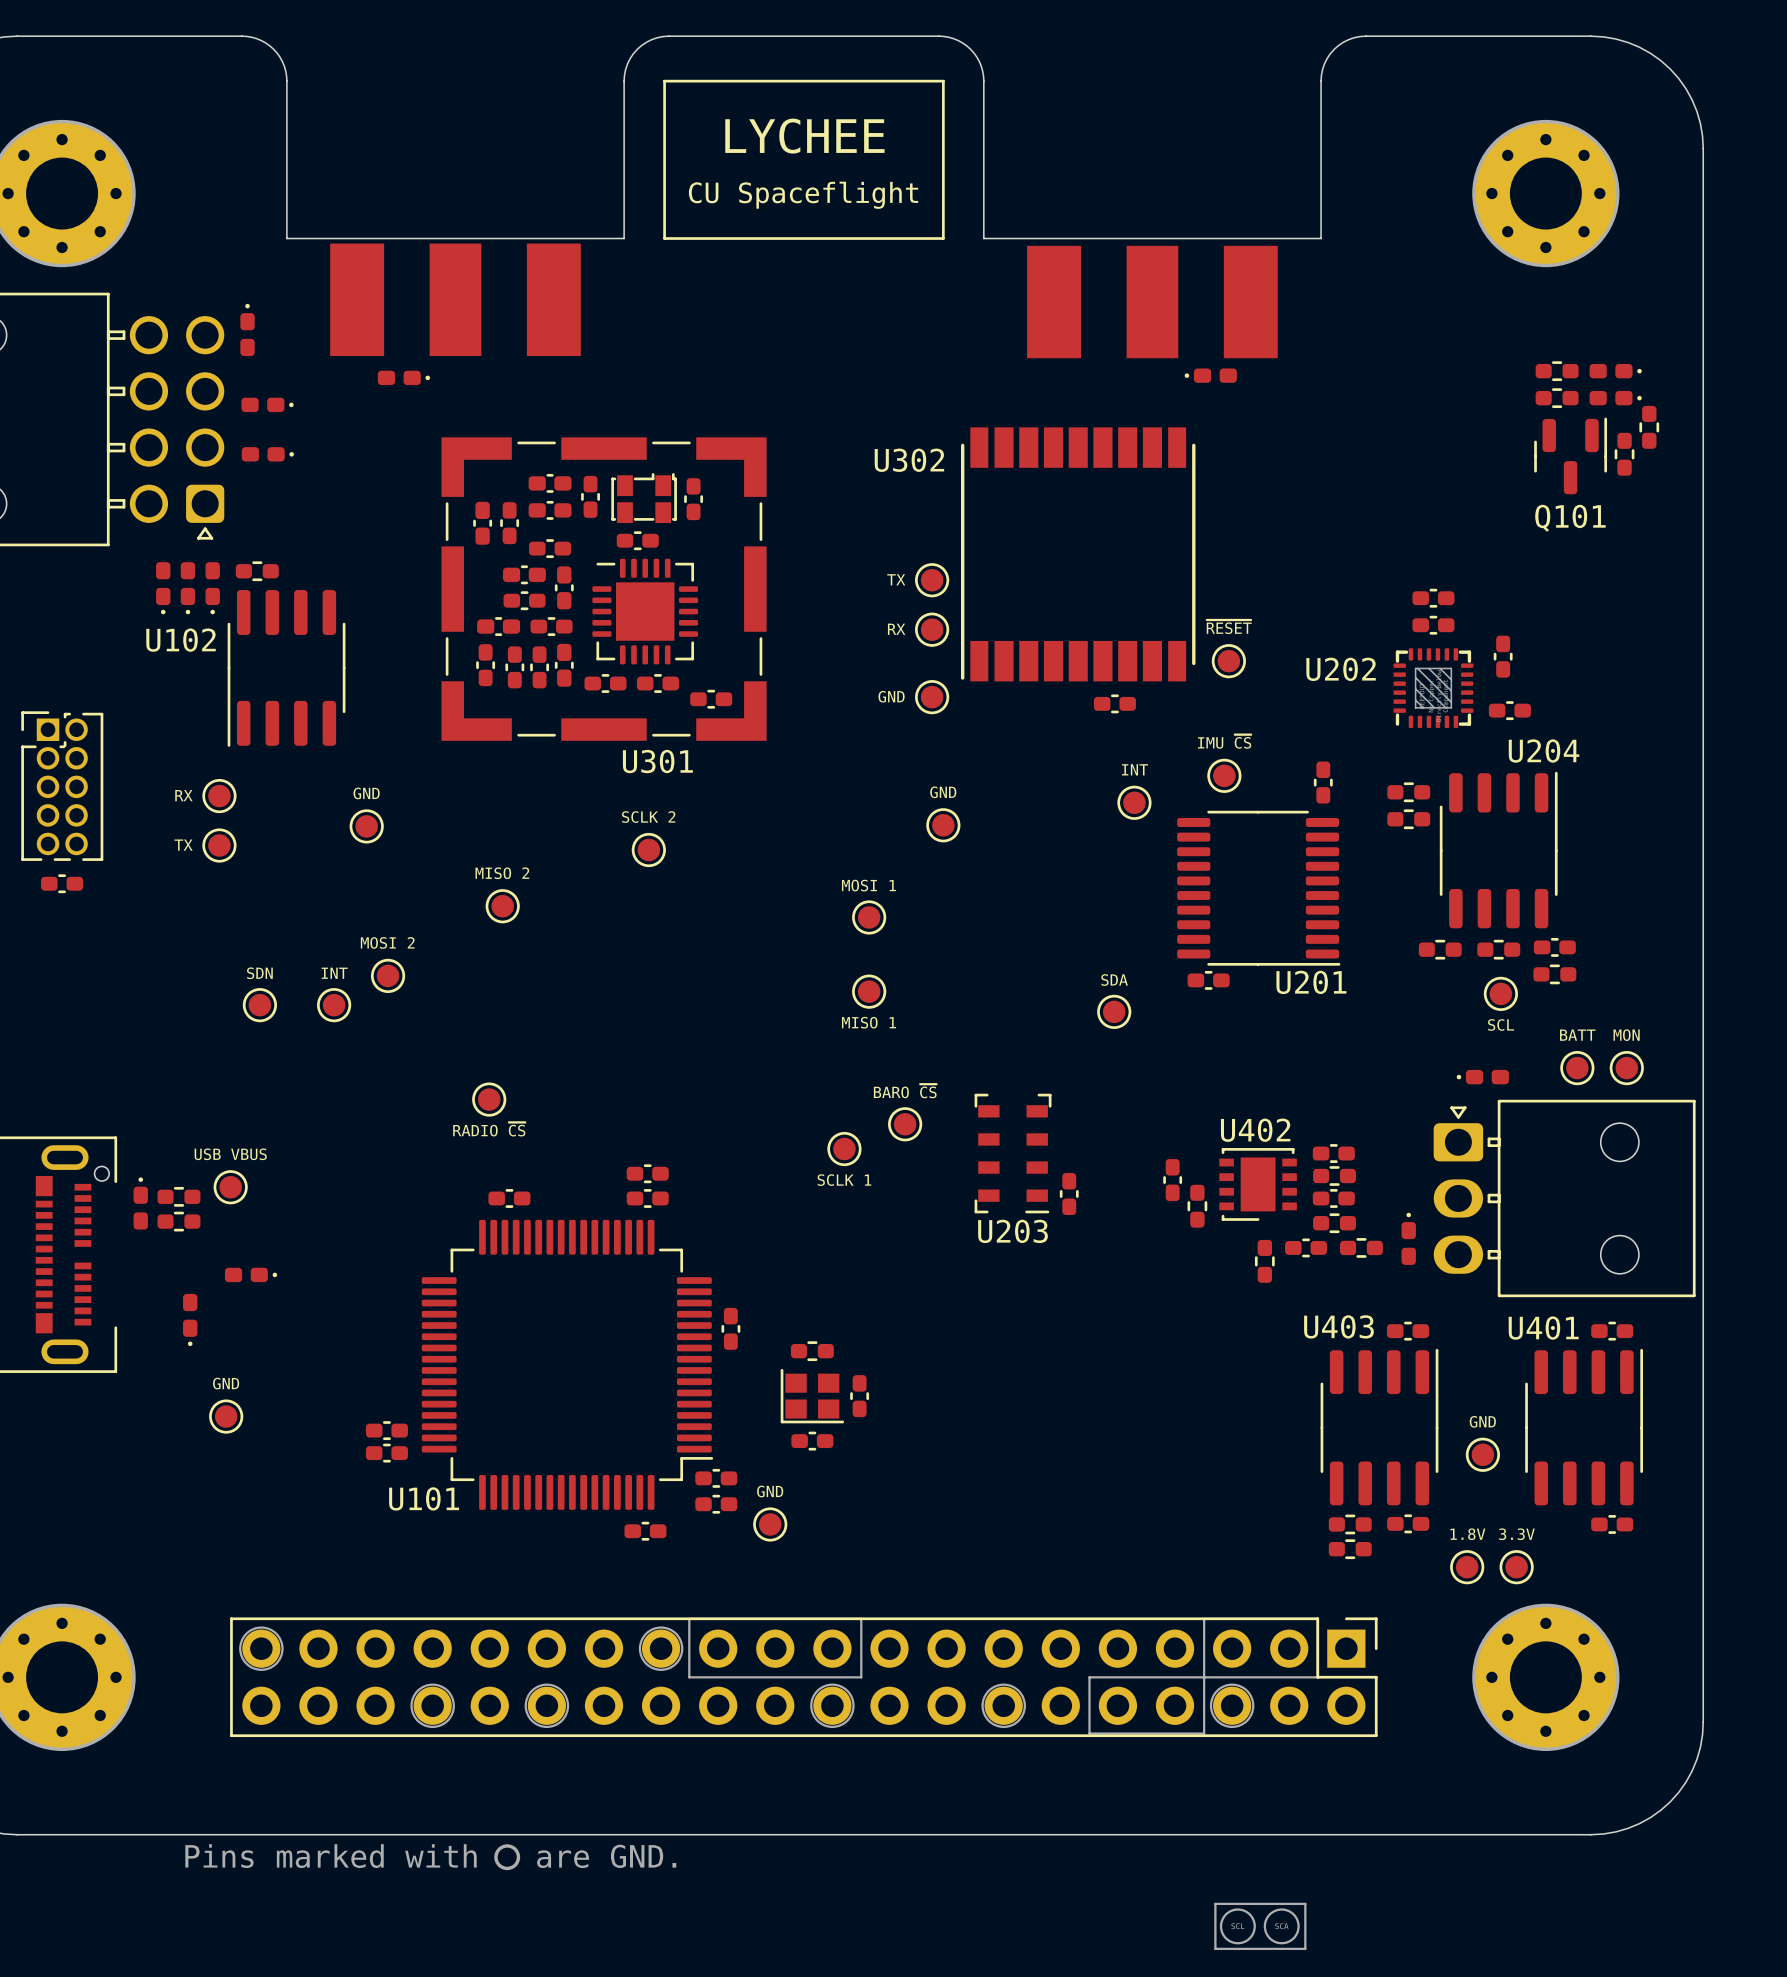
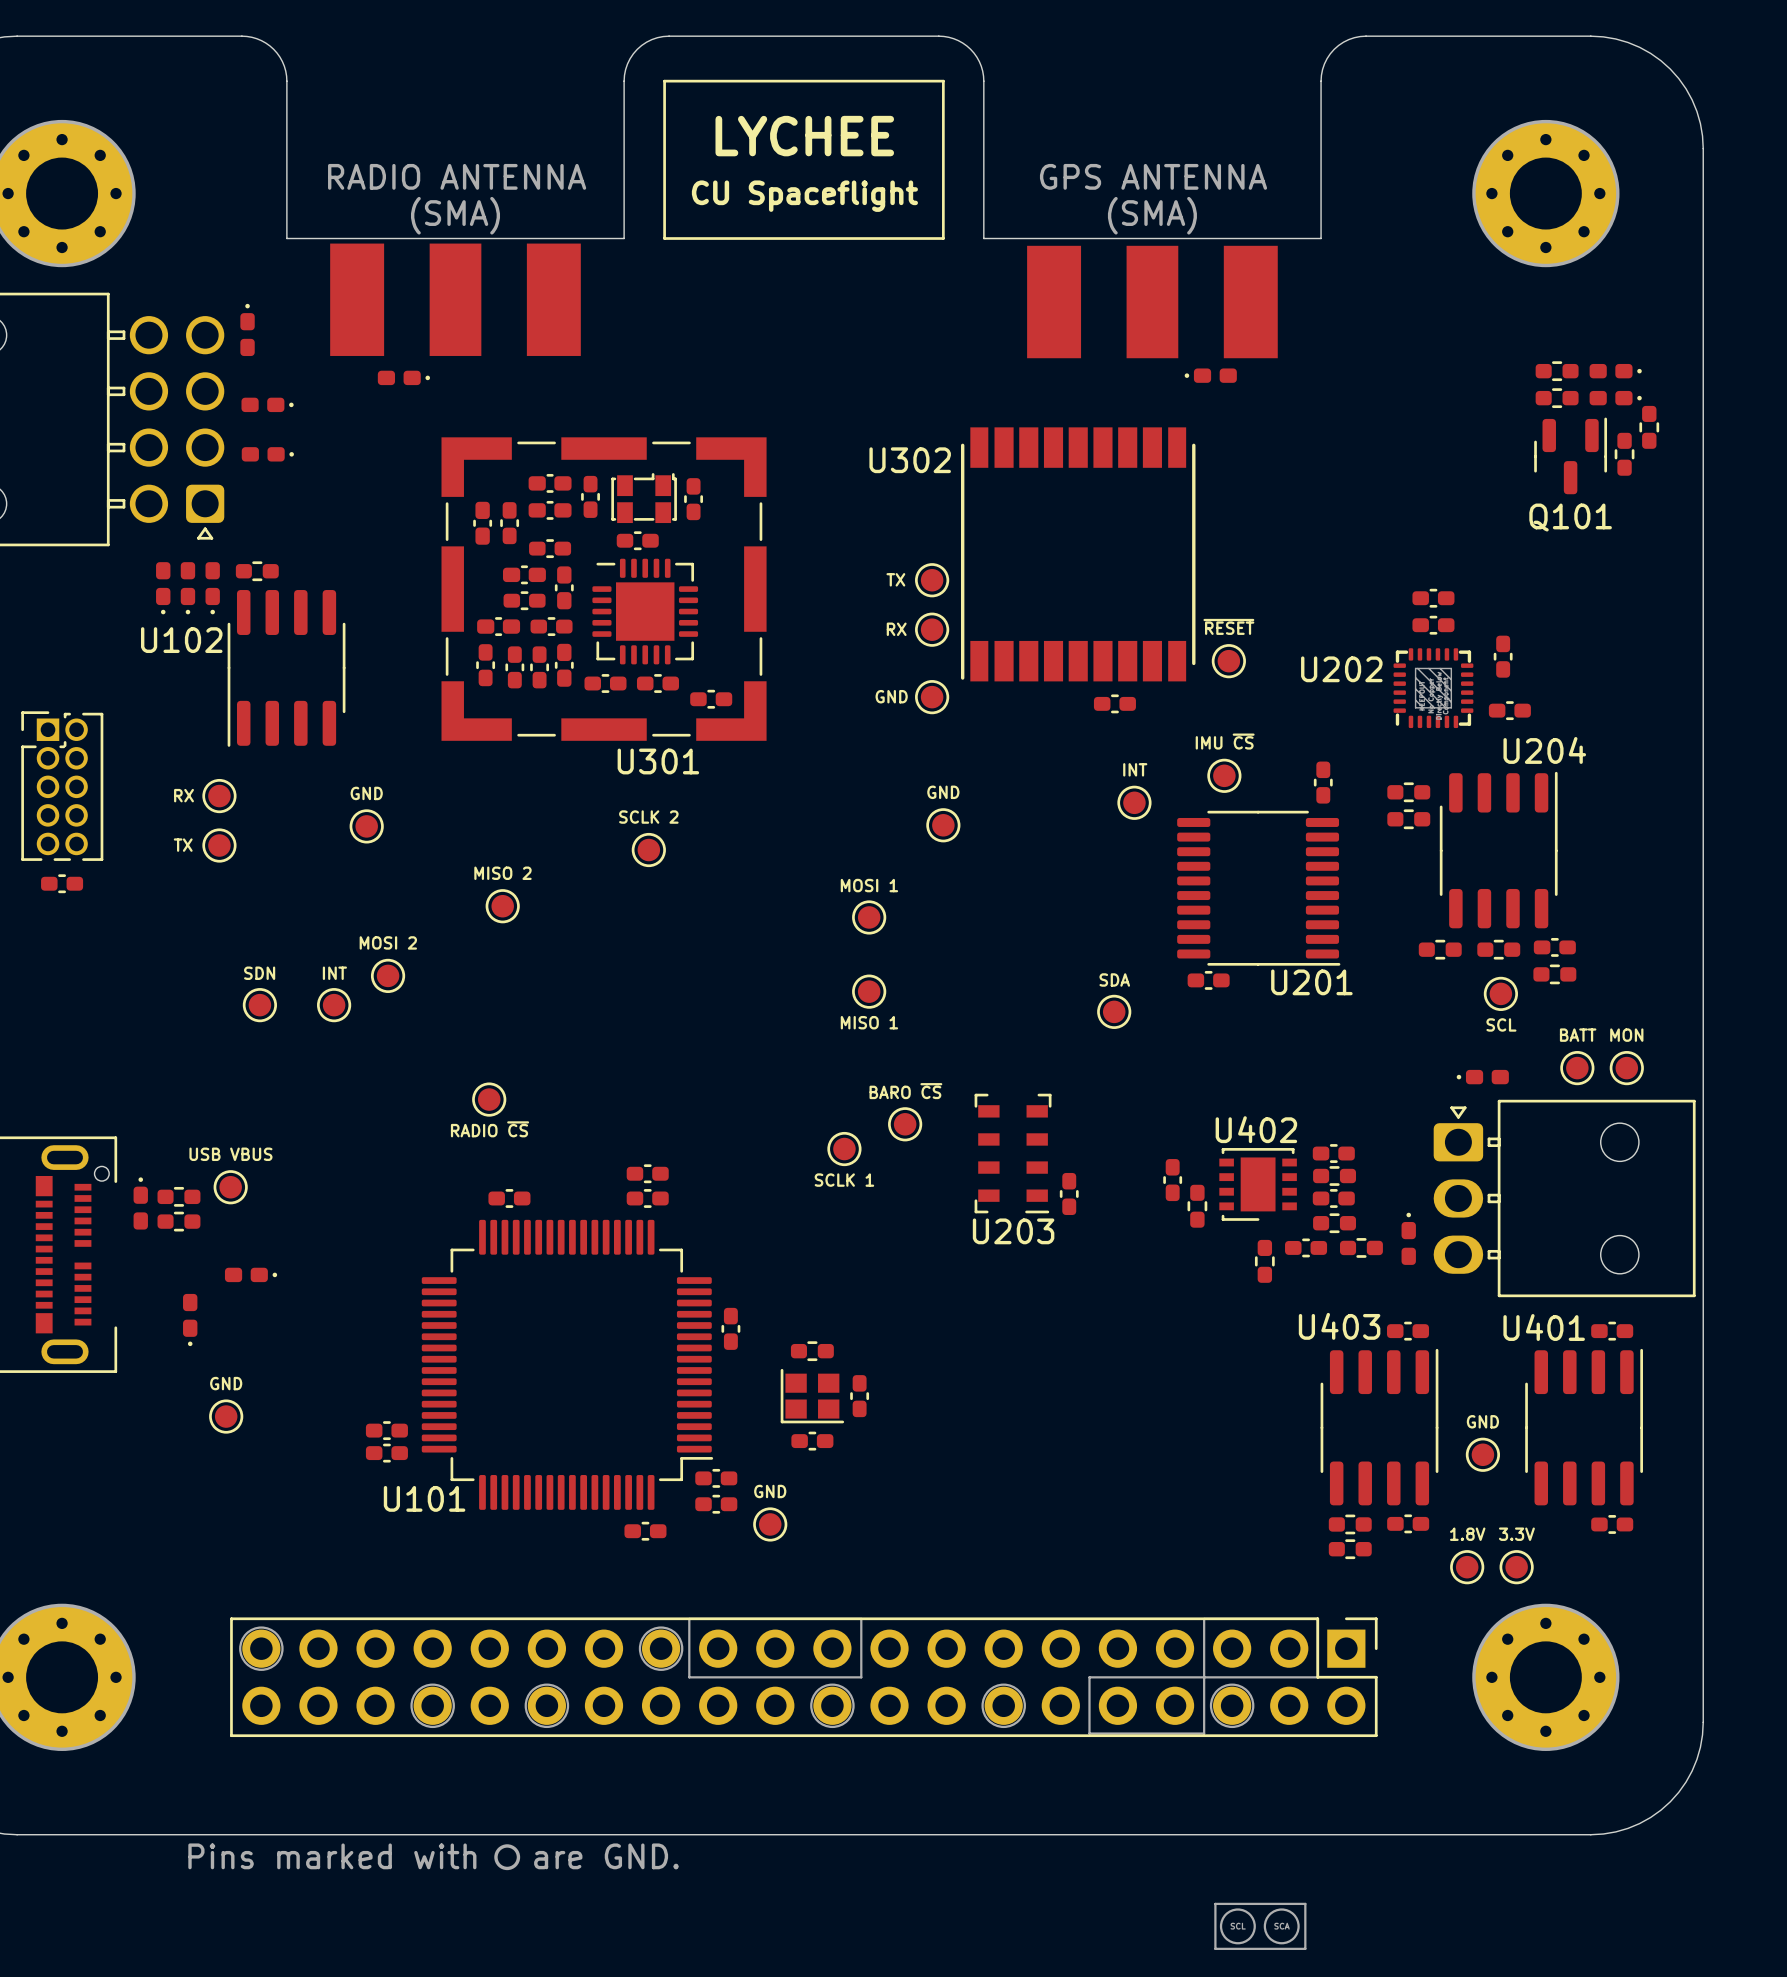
text: none -> RADIO ANTENNA (457, 176)
text: none -> GPS ANTENNA (1153, 176)
text: none -> (SMA) (455, 215)
text: none -> (SMA) (1152, 215)

